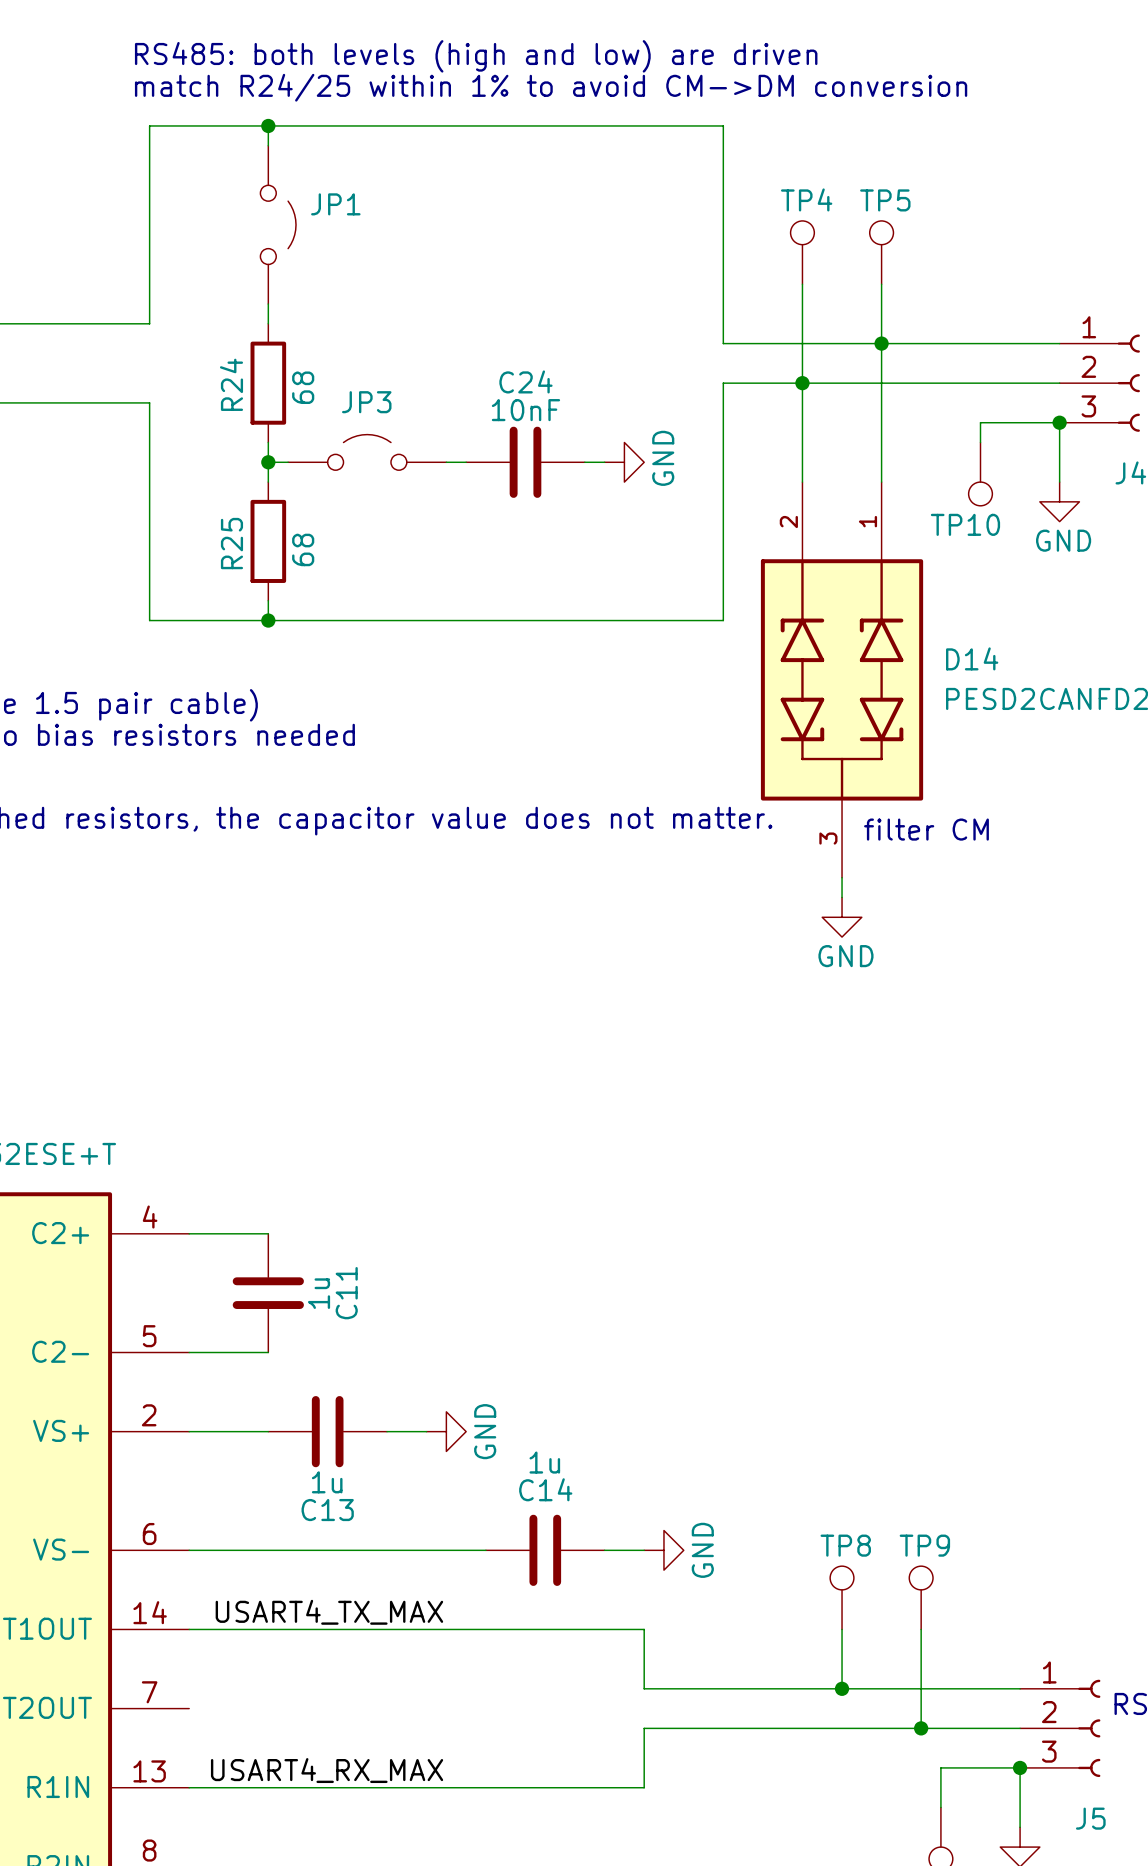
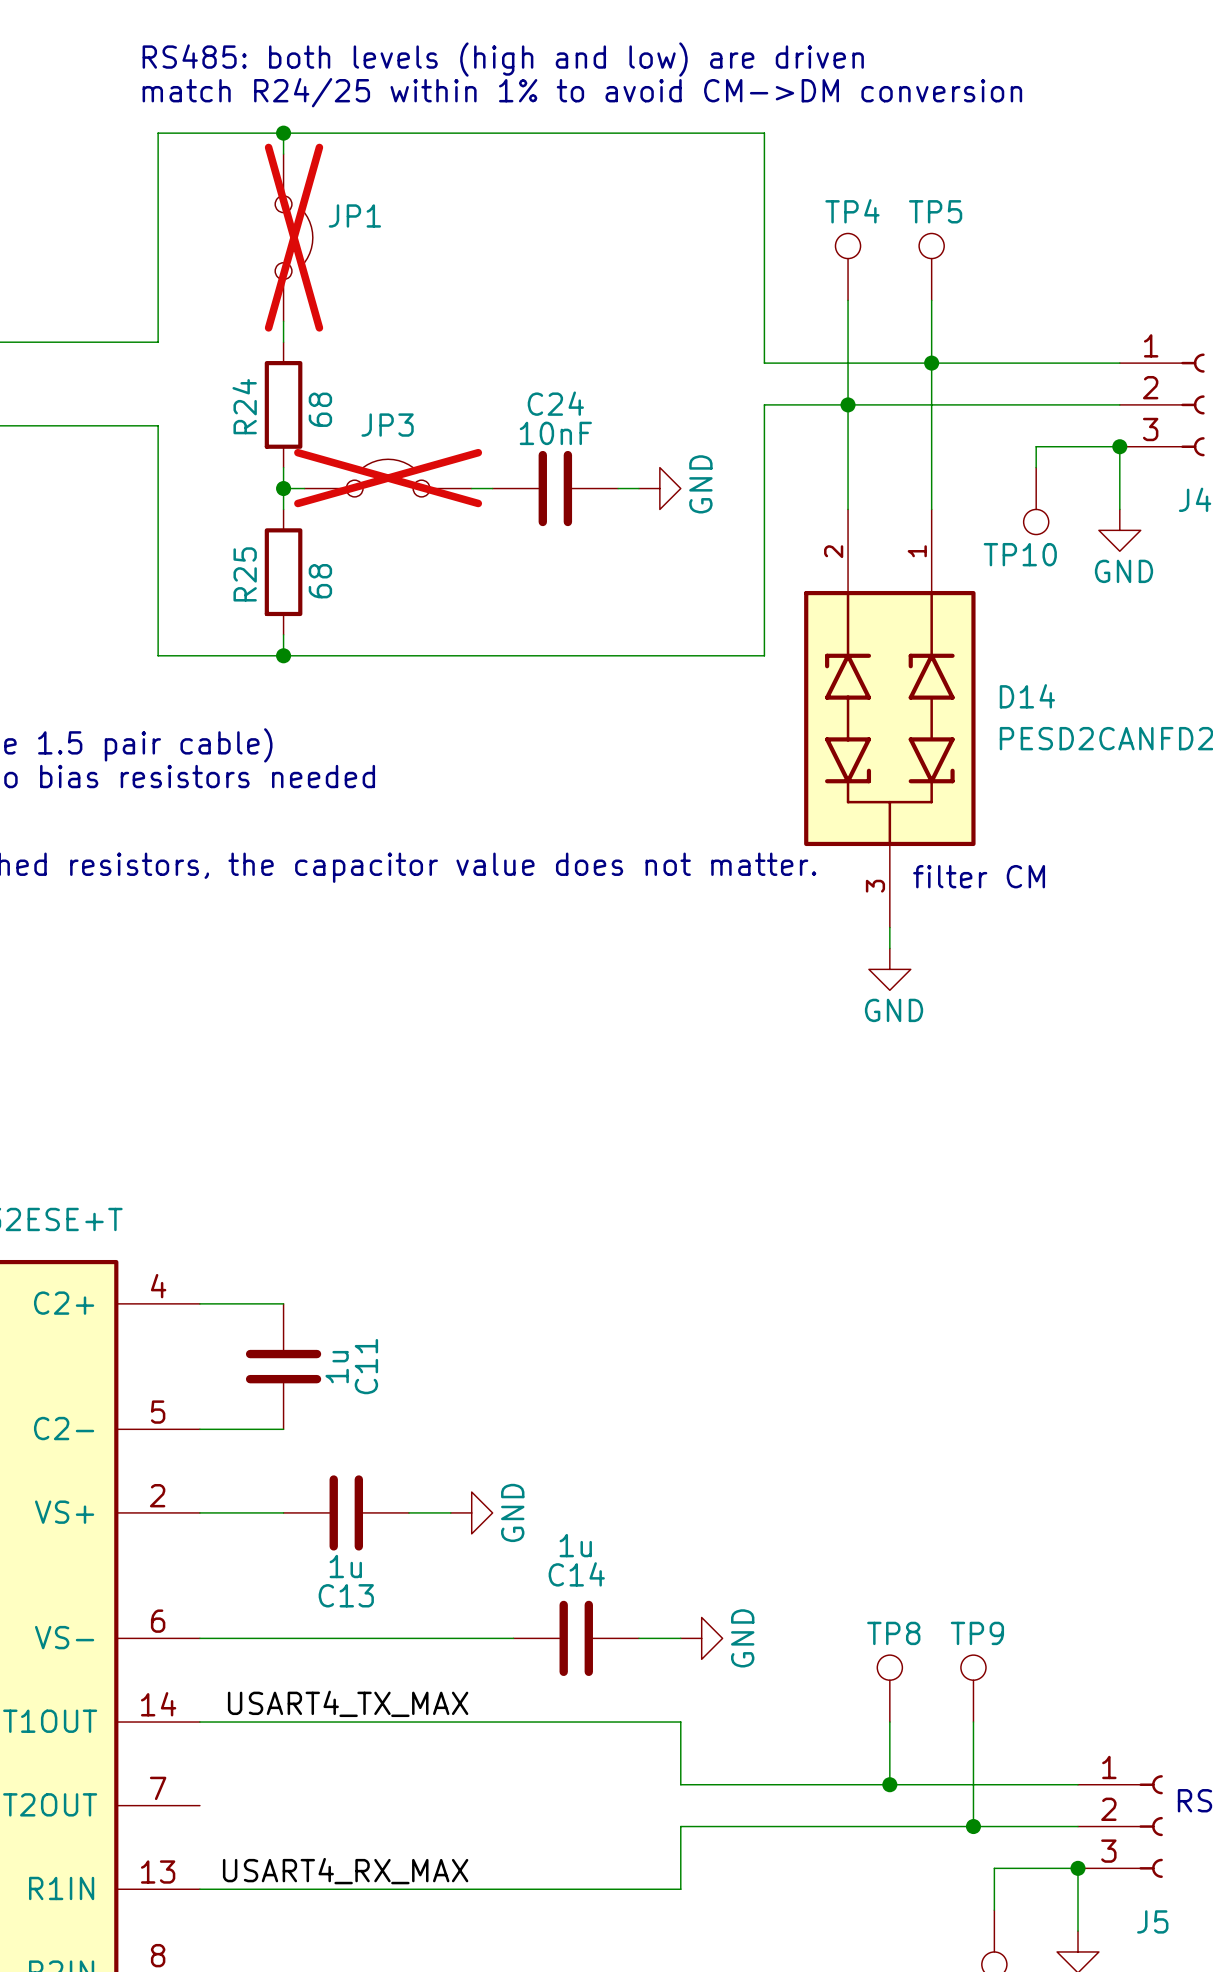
JP1 do-not-place cross: none -> (294, 237)
JP3 do-not-place cross: none -> (388, 478)

